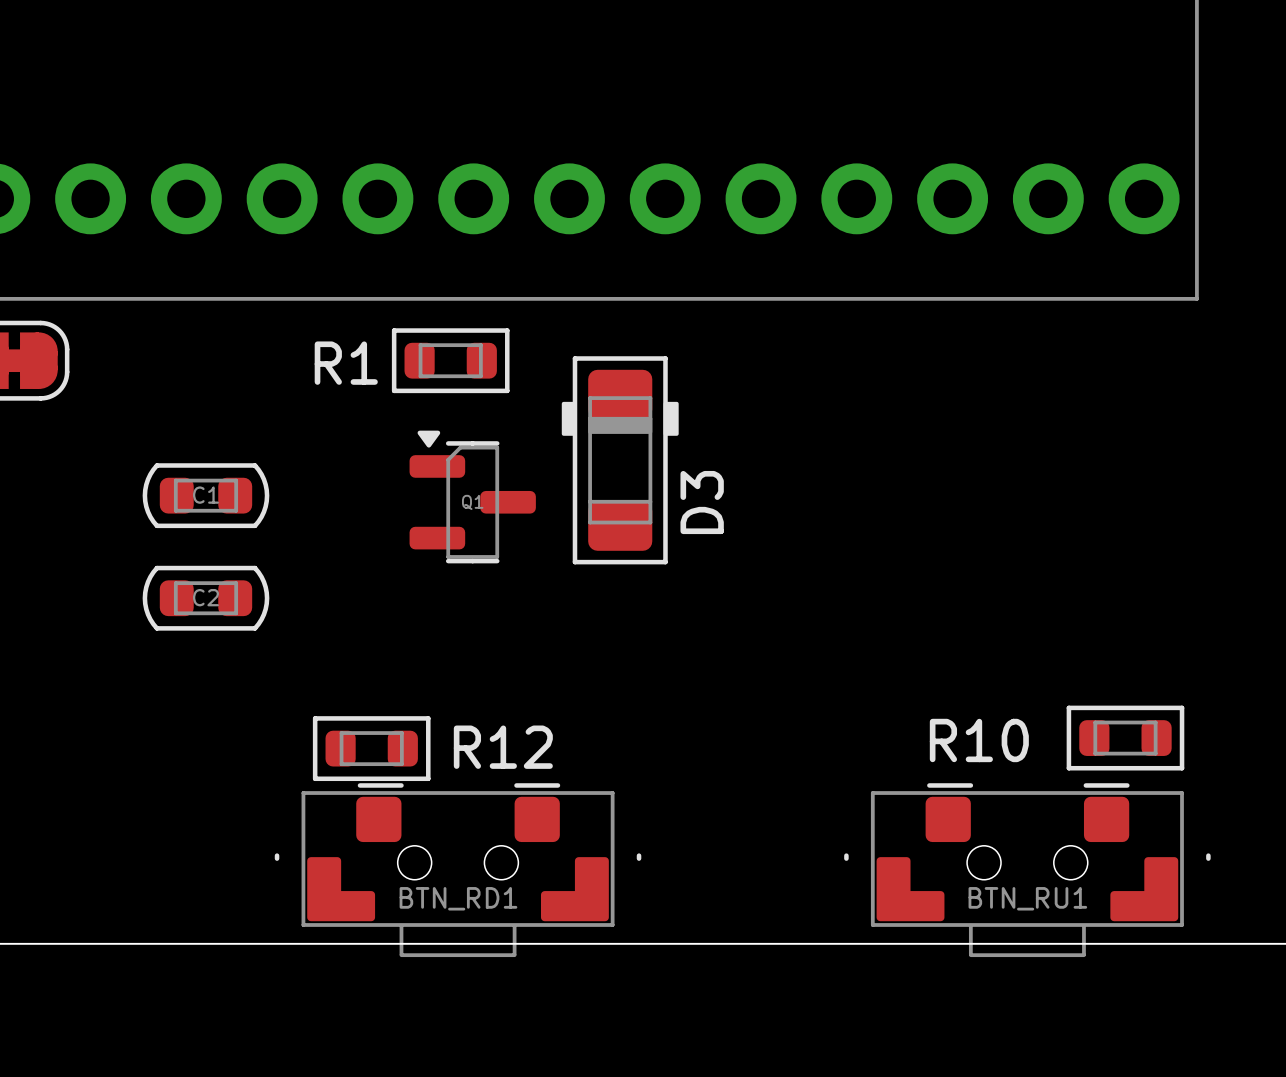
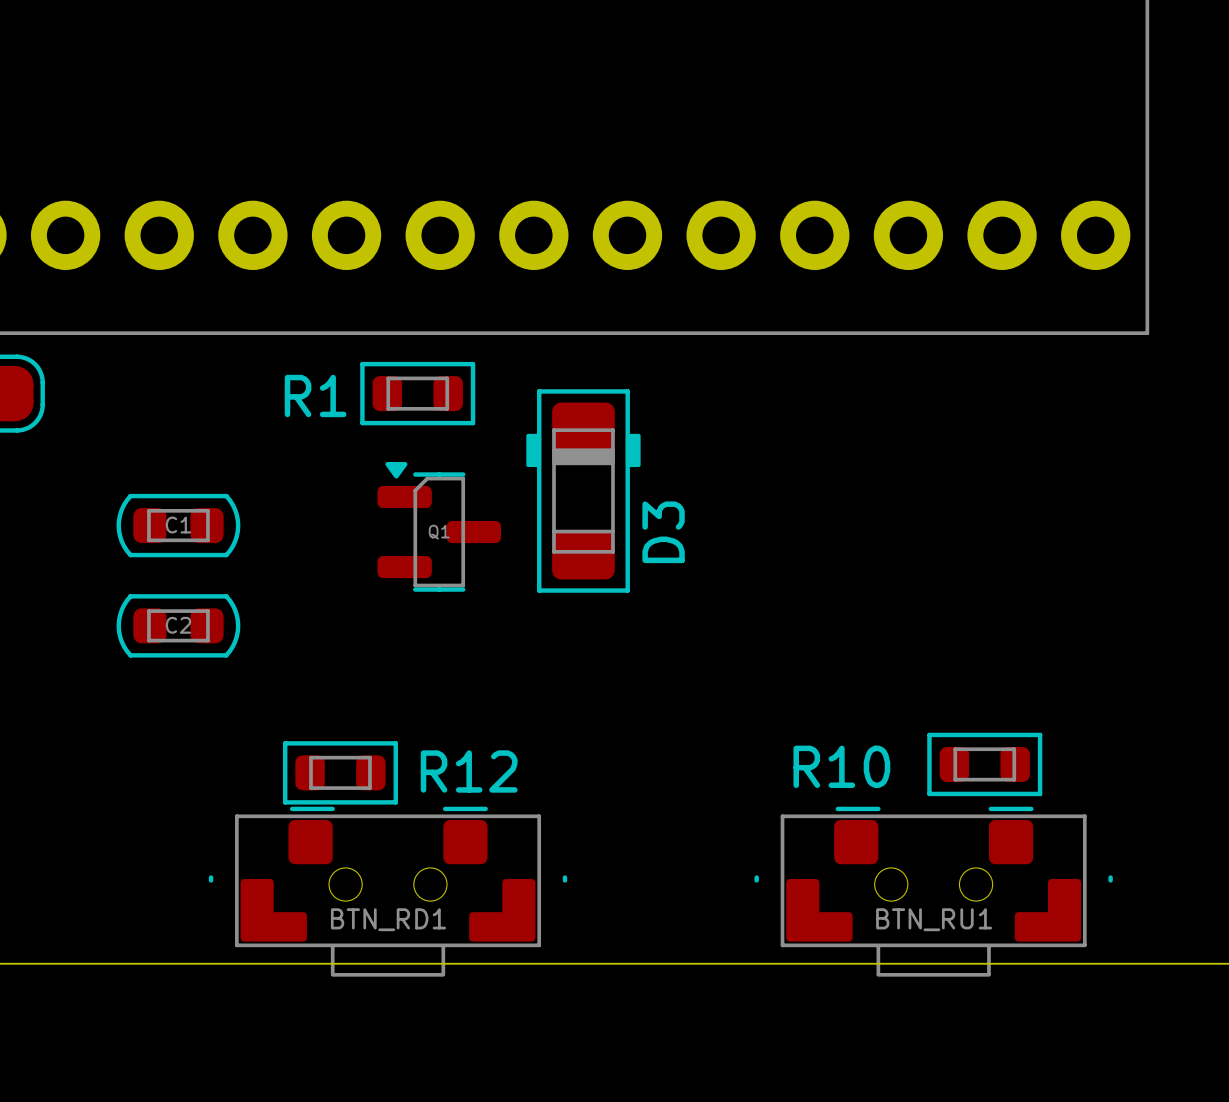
R10 position: (1125, 738) -> (984, 764)
BTN_RD1 position: (458, 870) -> (388, 891)
BTN_RU1 position: (1027, 870) -> (933, 891)

